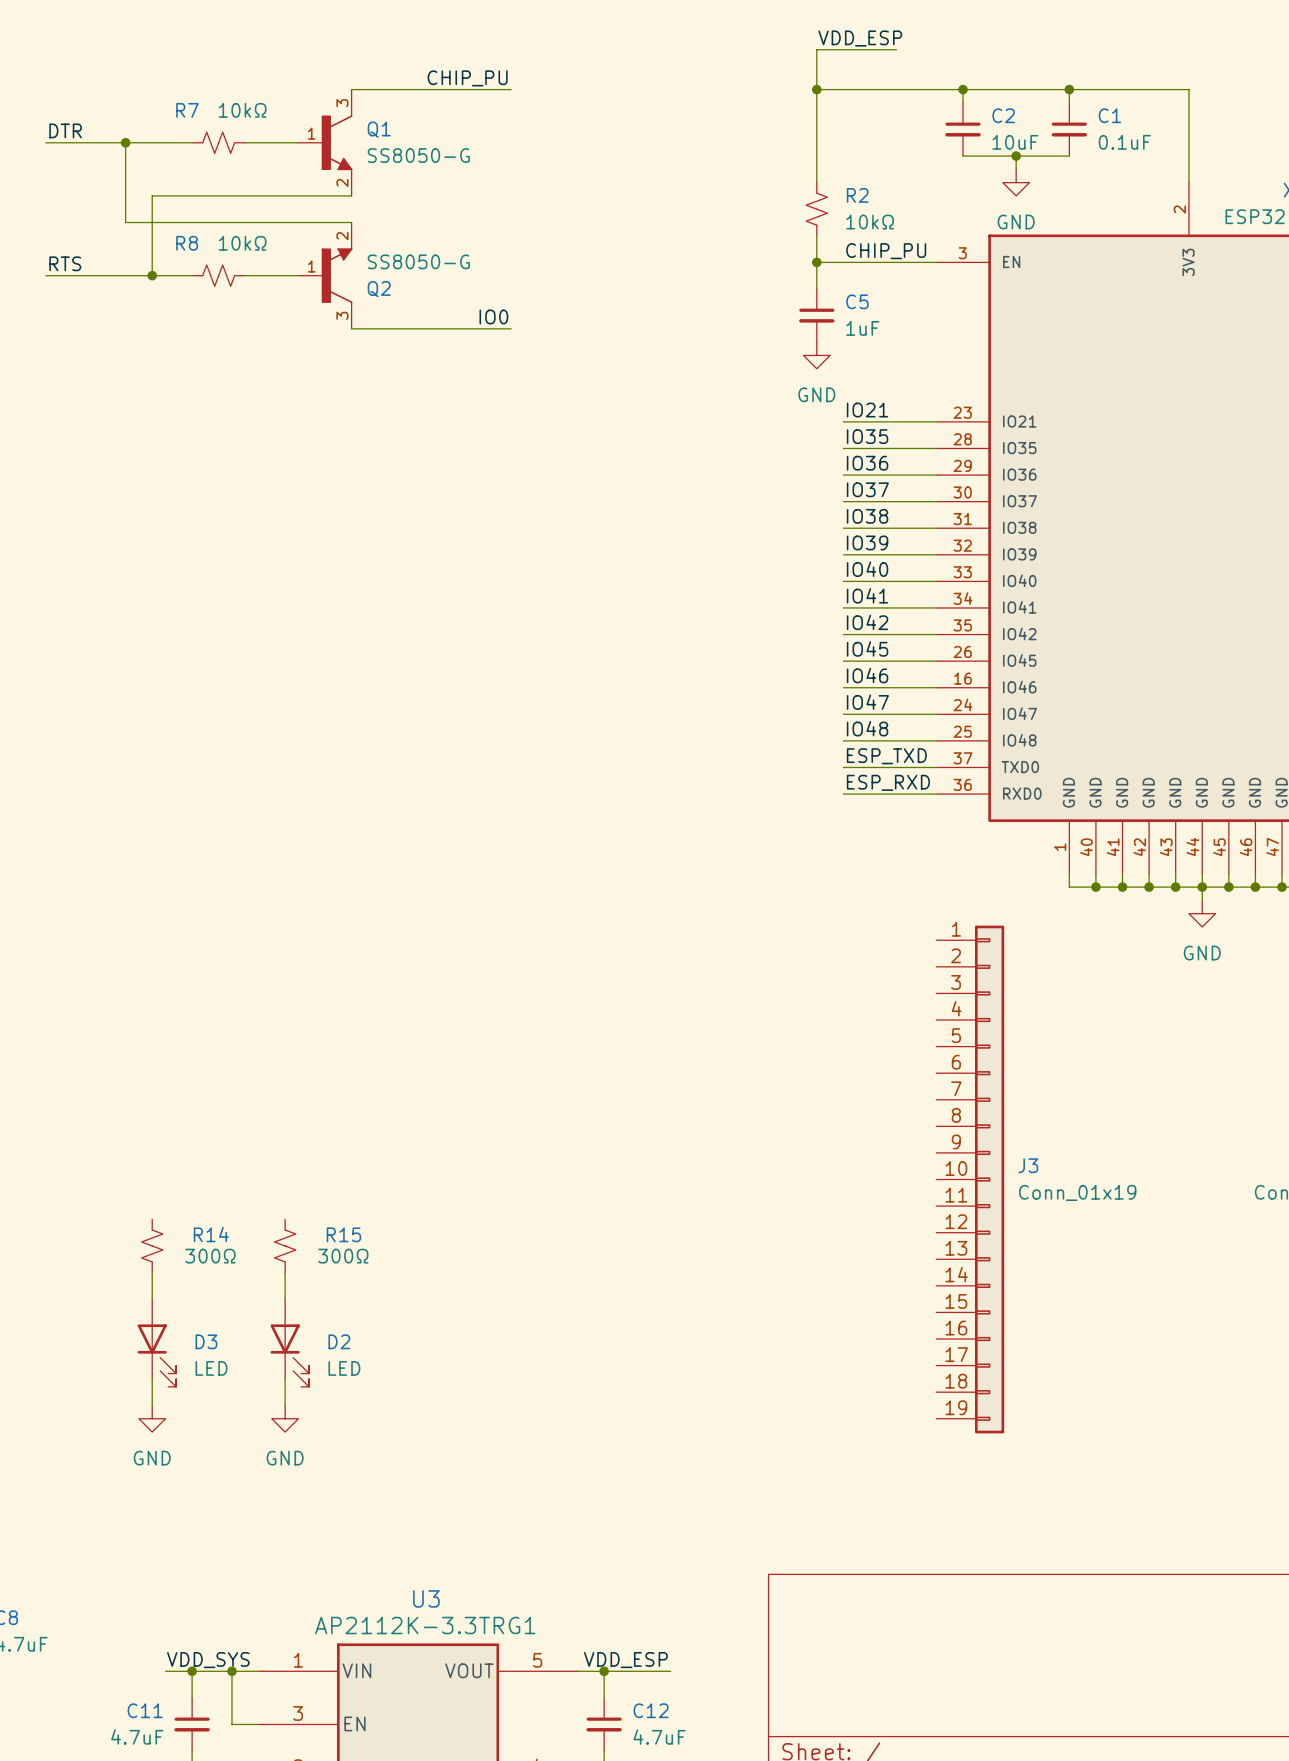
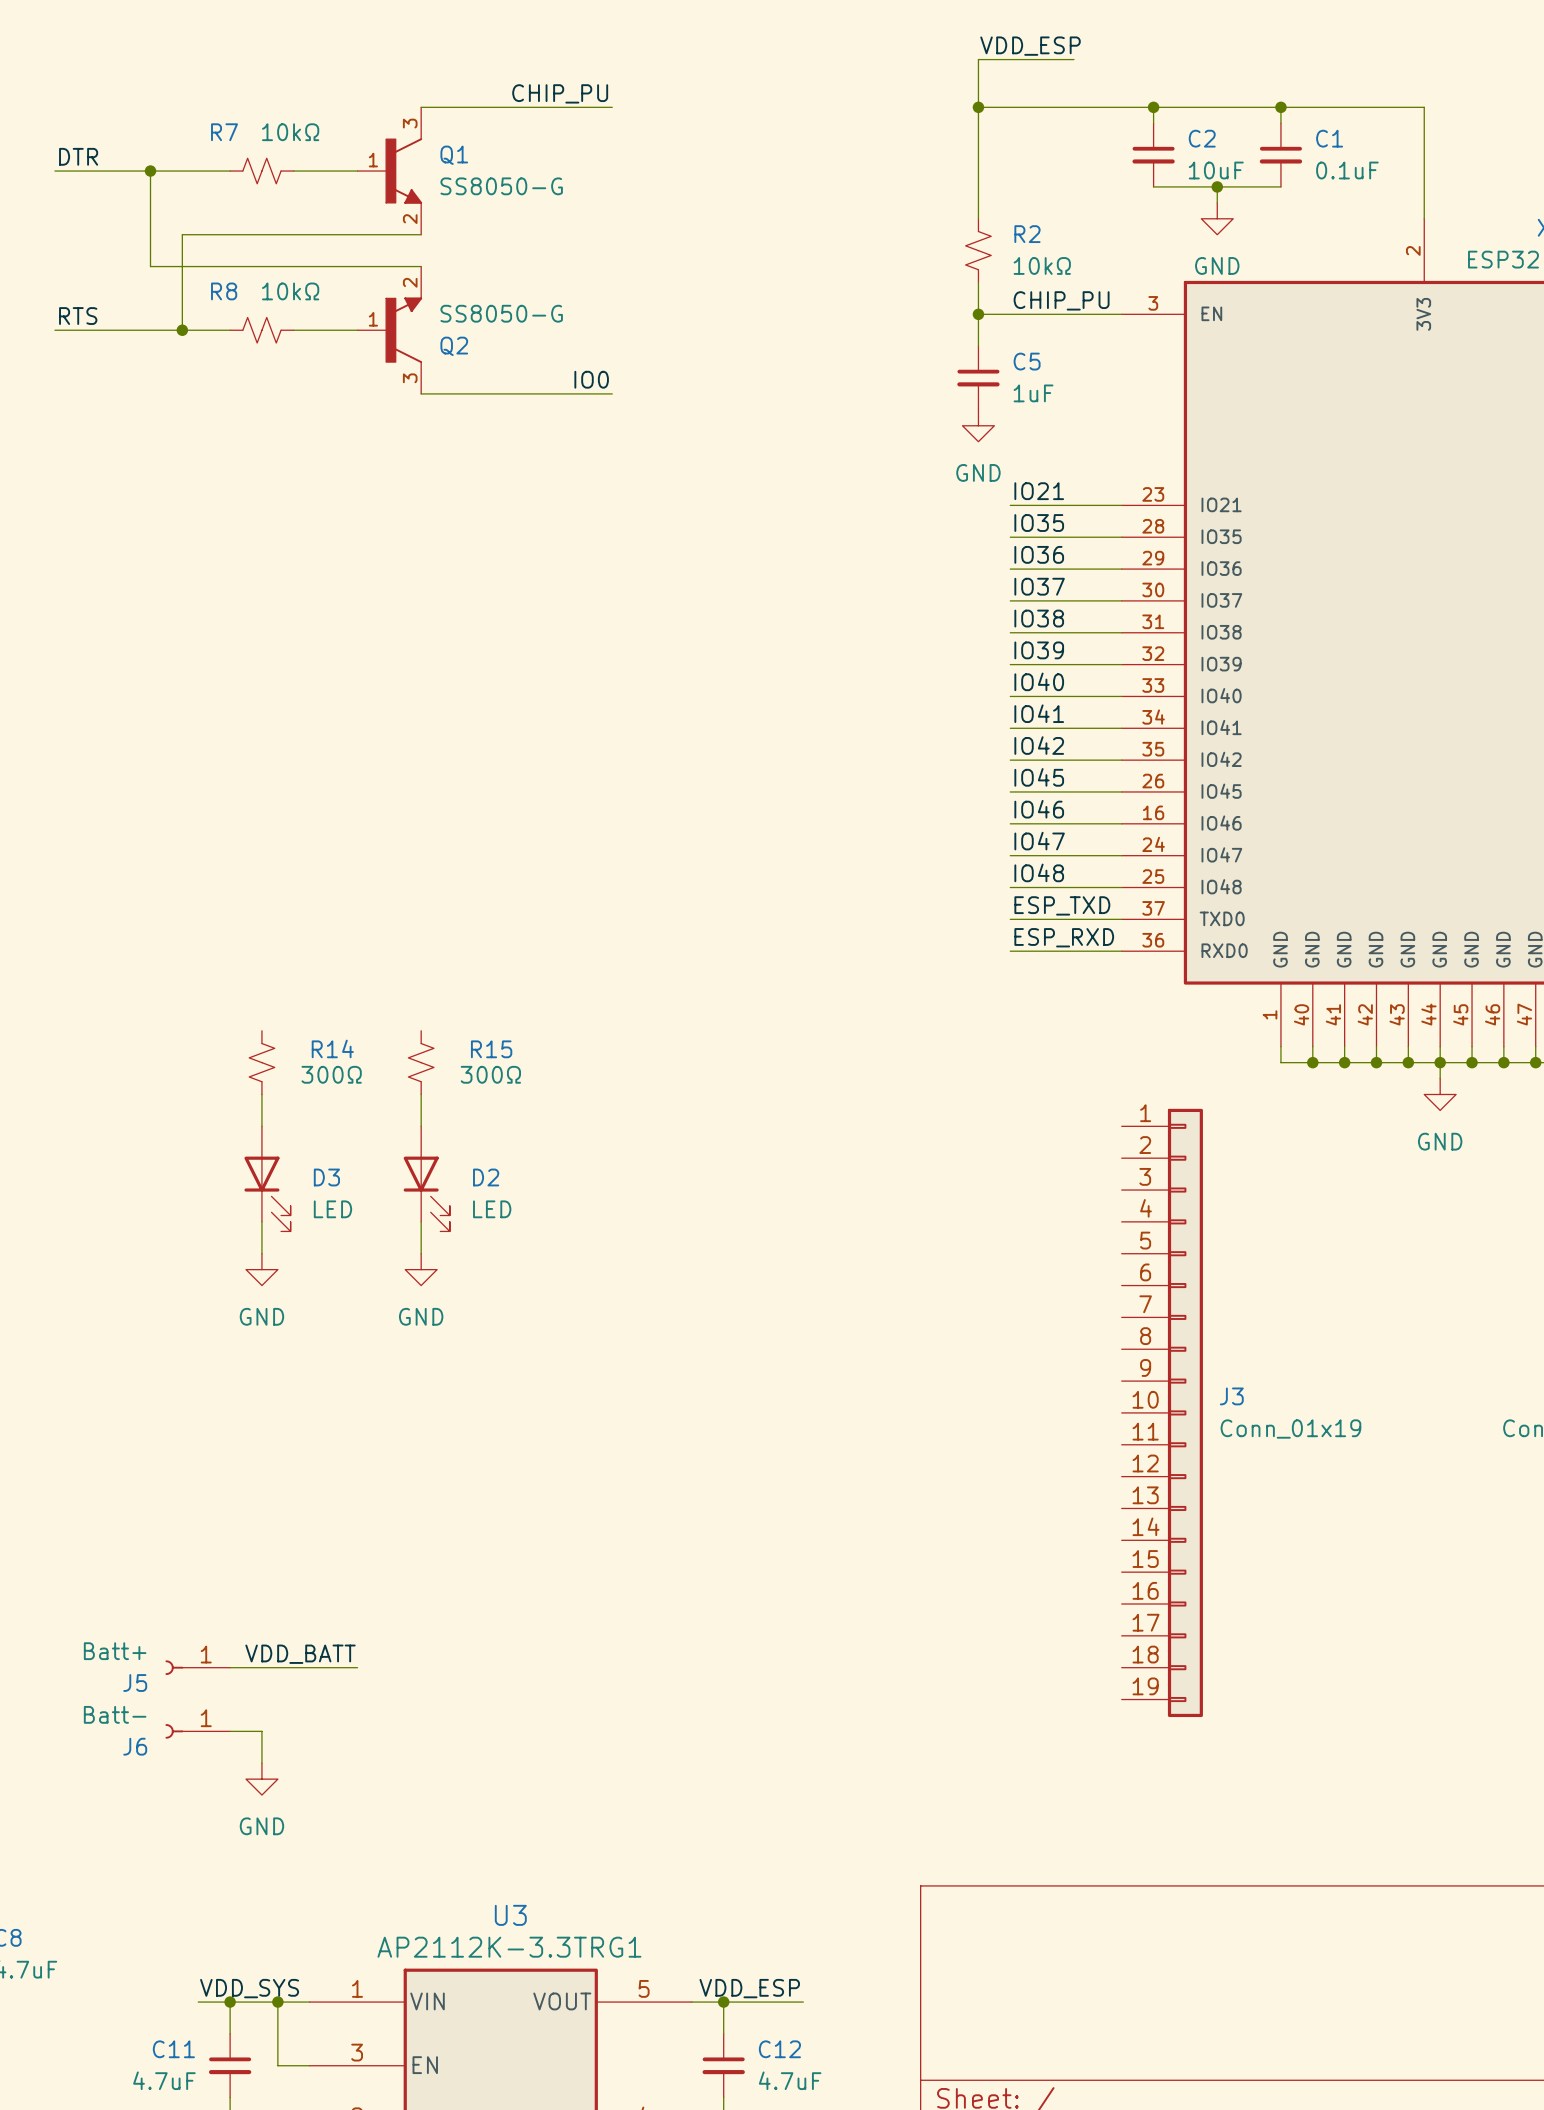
wire: none -> (261, 1094) (261, 1126)
wire: none -> (421, 1094) (421, 1126)
power symbol: none -> GND (261, 1269)
power symbol: none -> GND (421, 1269)
R14 position: (152, 1245) -> (261, 1062)
R15 position: (285, 1245) -> (421, 1062)
wire: (152, 1272) (152, 1299) -> (261, 1221) (261, 1253)
wire: (285, 1272) (285, 1299) -> (421, 1221) (421, 1253)
D3 position: (156, 1343) -> (267, 1178)
D2 position: (289, 1343) -> (426, 1178)
wire: (152, 1378) (152, 1405) -> none
wire: (285, 1378) (285, 1405) -> none
label: none -> VDD_BATT (300, 1654)
J5: none -> Batt+ (197, 1667)
wire: none -> (230, 1667) (357, 1667)
power symbol: GND (152, 1418) -> none
power symbol: GND (285, 1418) -> none
J6: none -> Batt- (197, 1731)
wire: none -> (230, 1731) (261, 1731) (261, 1763)
power symbol: none -> GND (261, 1779)

